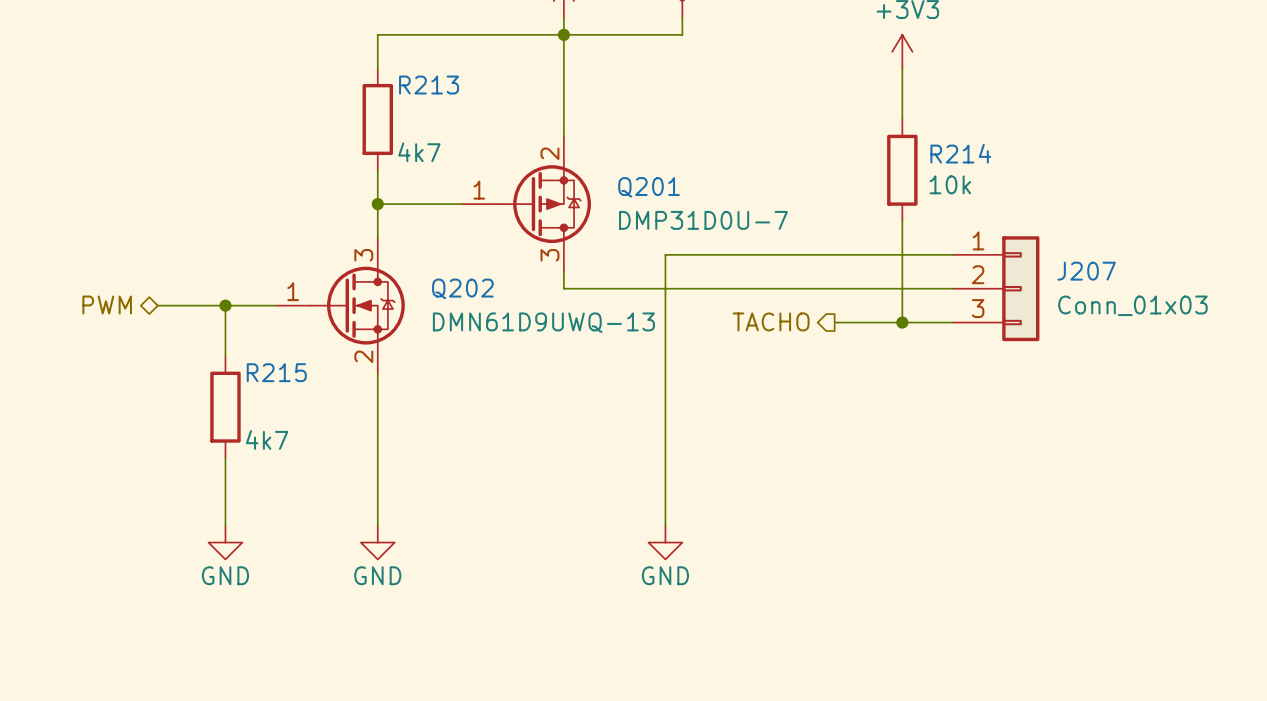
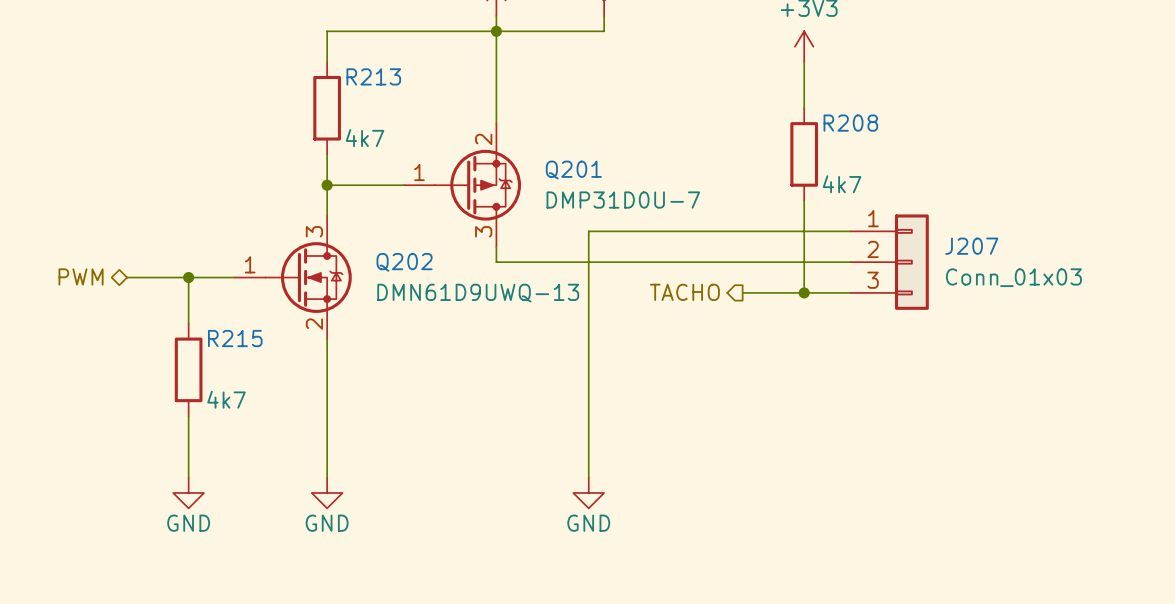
R214 name: R214 (960, 153) -> R208 (850, 123)
R214 value: 10k (950, 184) -> 4k7 (842, 184)

